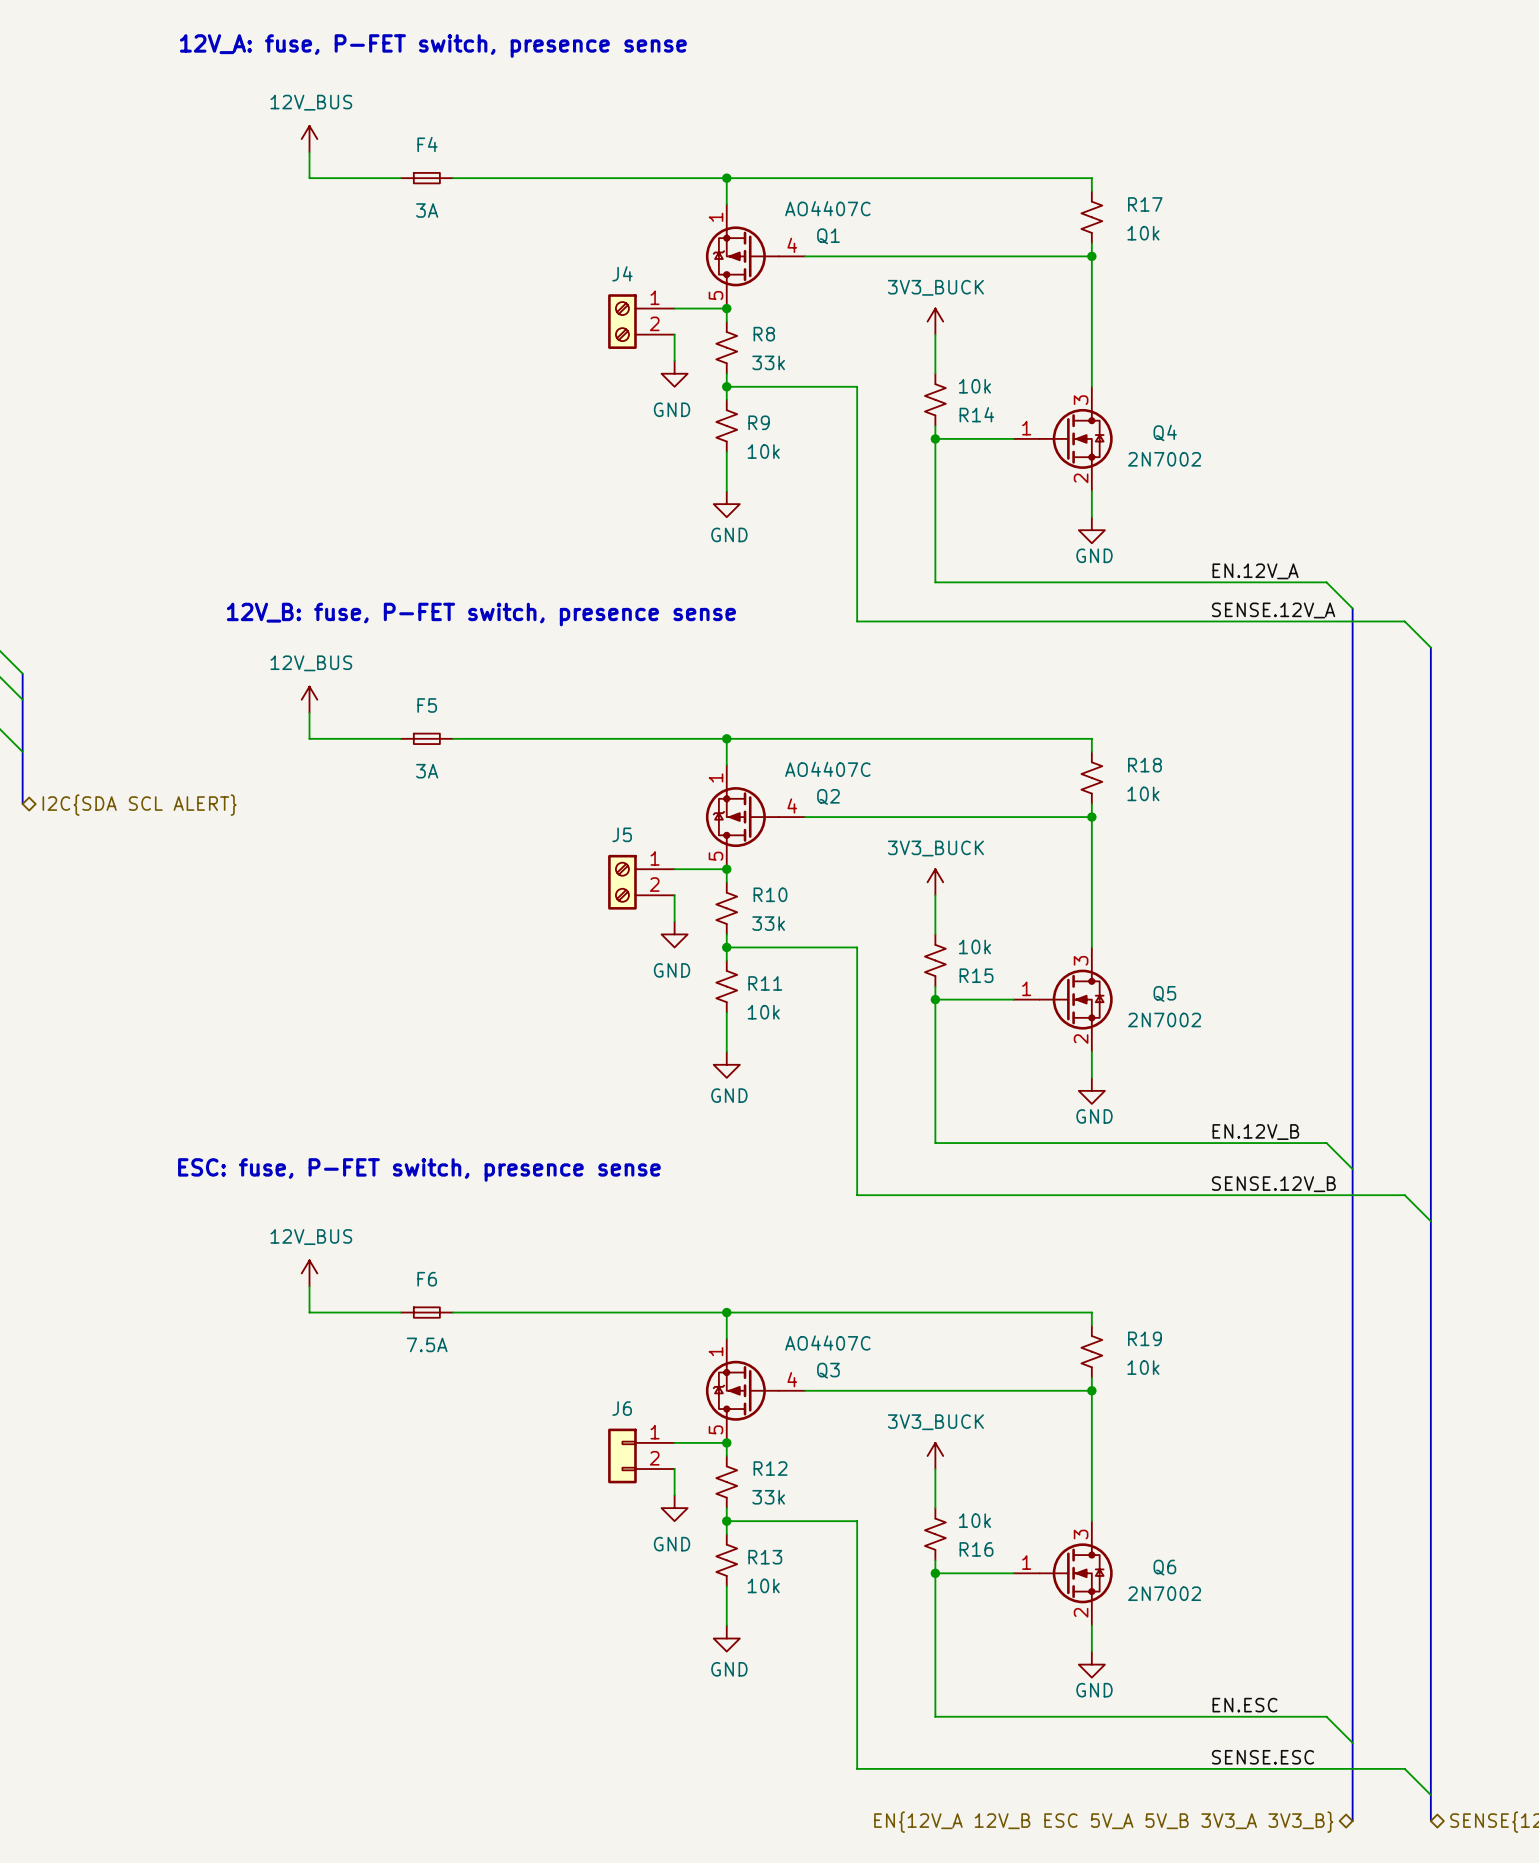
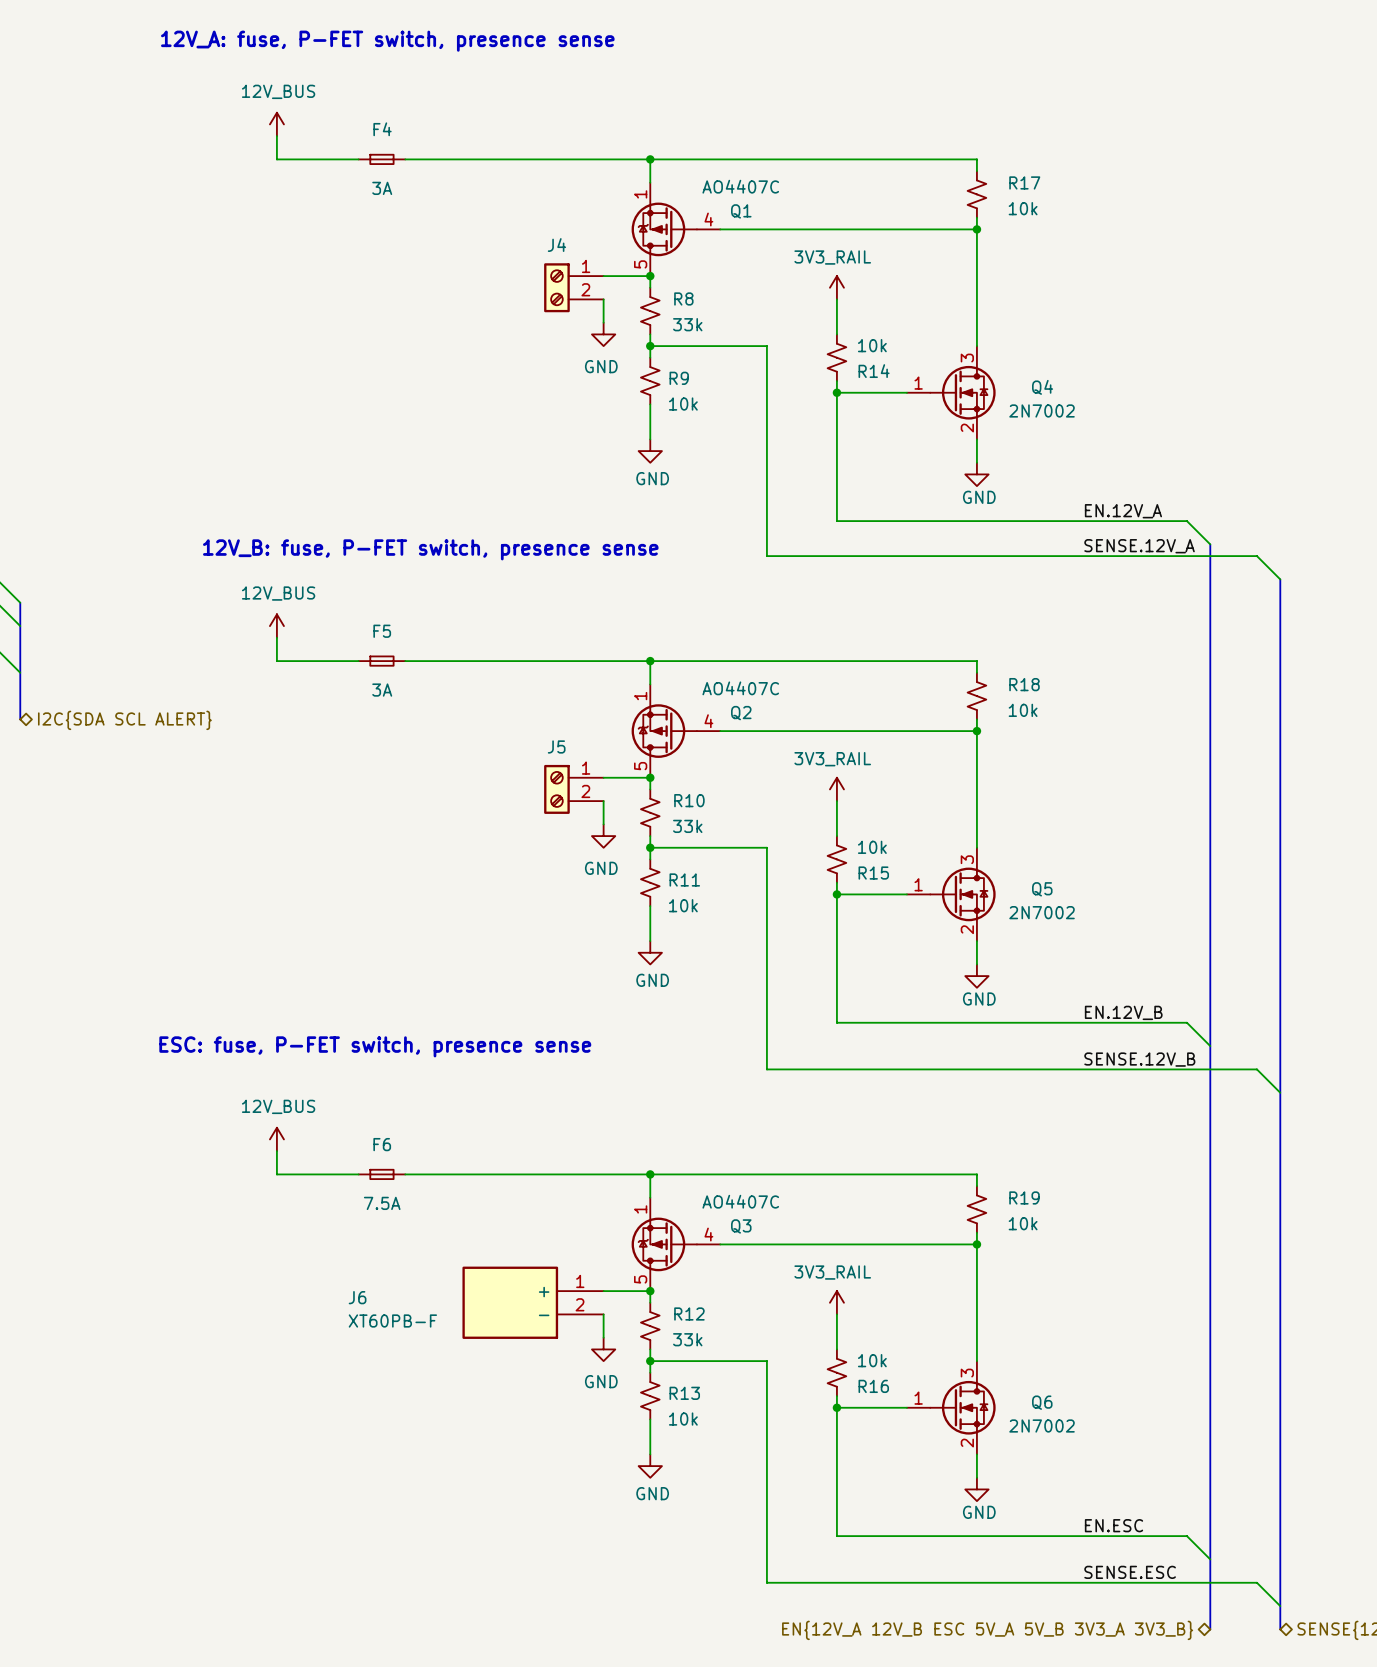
power symbol: 3V3_BUCK (935, 321) -> 3V3_RAIL (836, 287)
power symbol: 3V3_BUCK (935, 882) -> 3V3_RAIL (836, 789)
J6 name position: J6 (622, 1408) -> J6 (357, 1297)
J6 symbol: [608, 1428, 675, 1484] -> [462, 1266, 604, 1339]
power symbol: 3V3_BUCK (935, 1455) -> 3V3_RAIL (836, 1302)
J6 value: none -> XT60PB-F (392, 1320)

